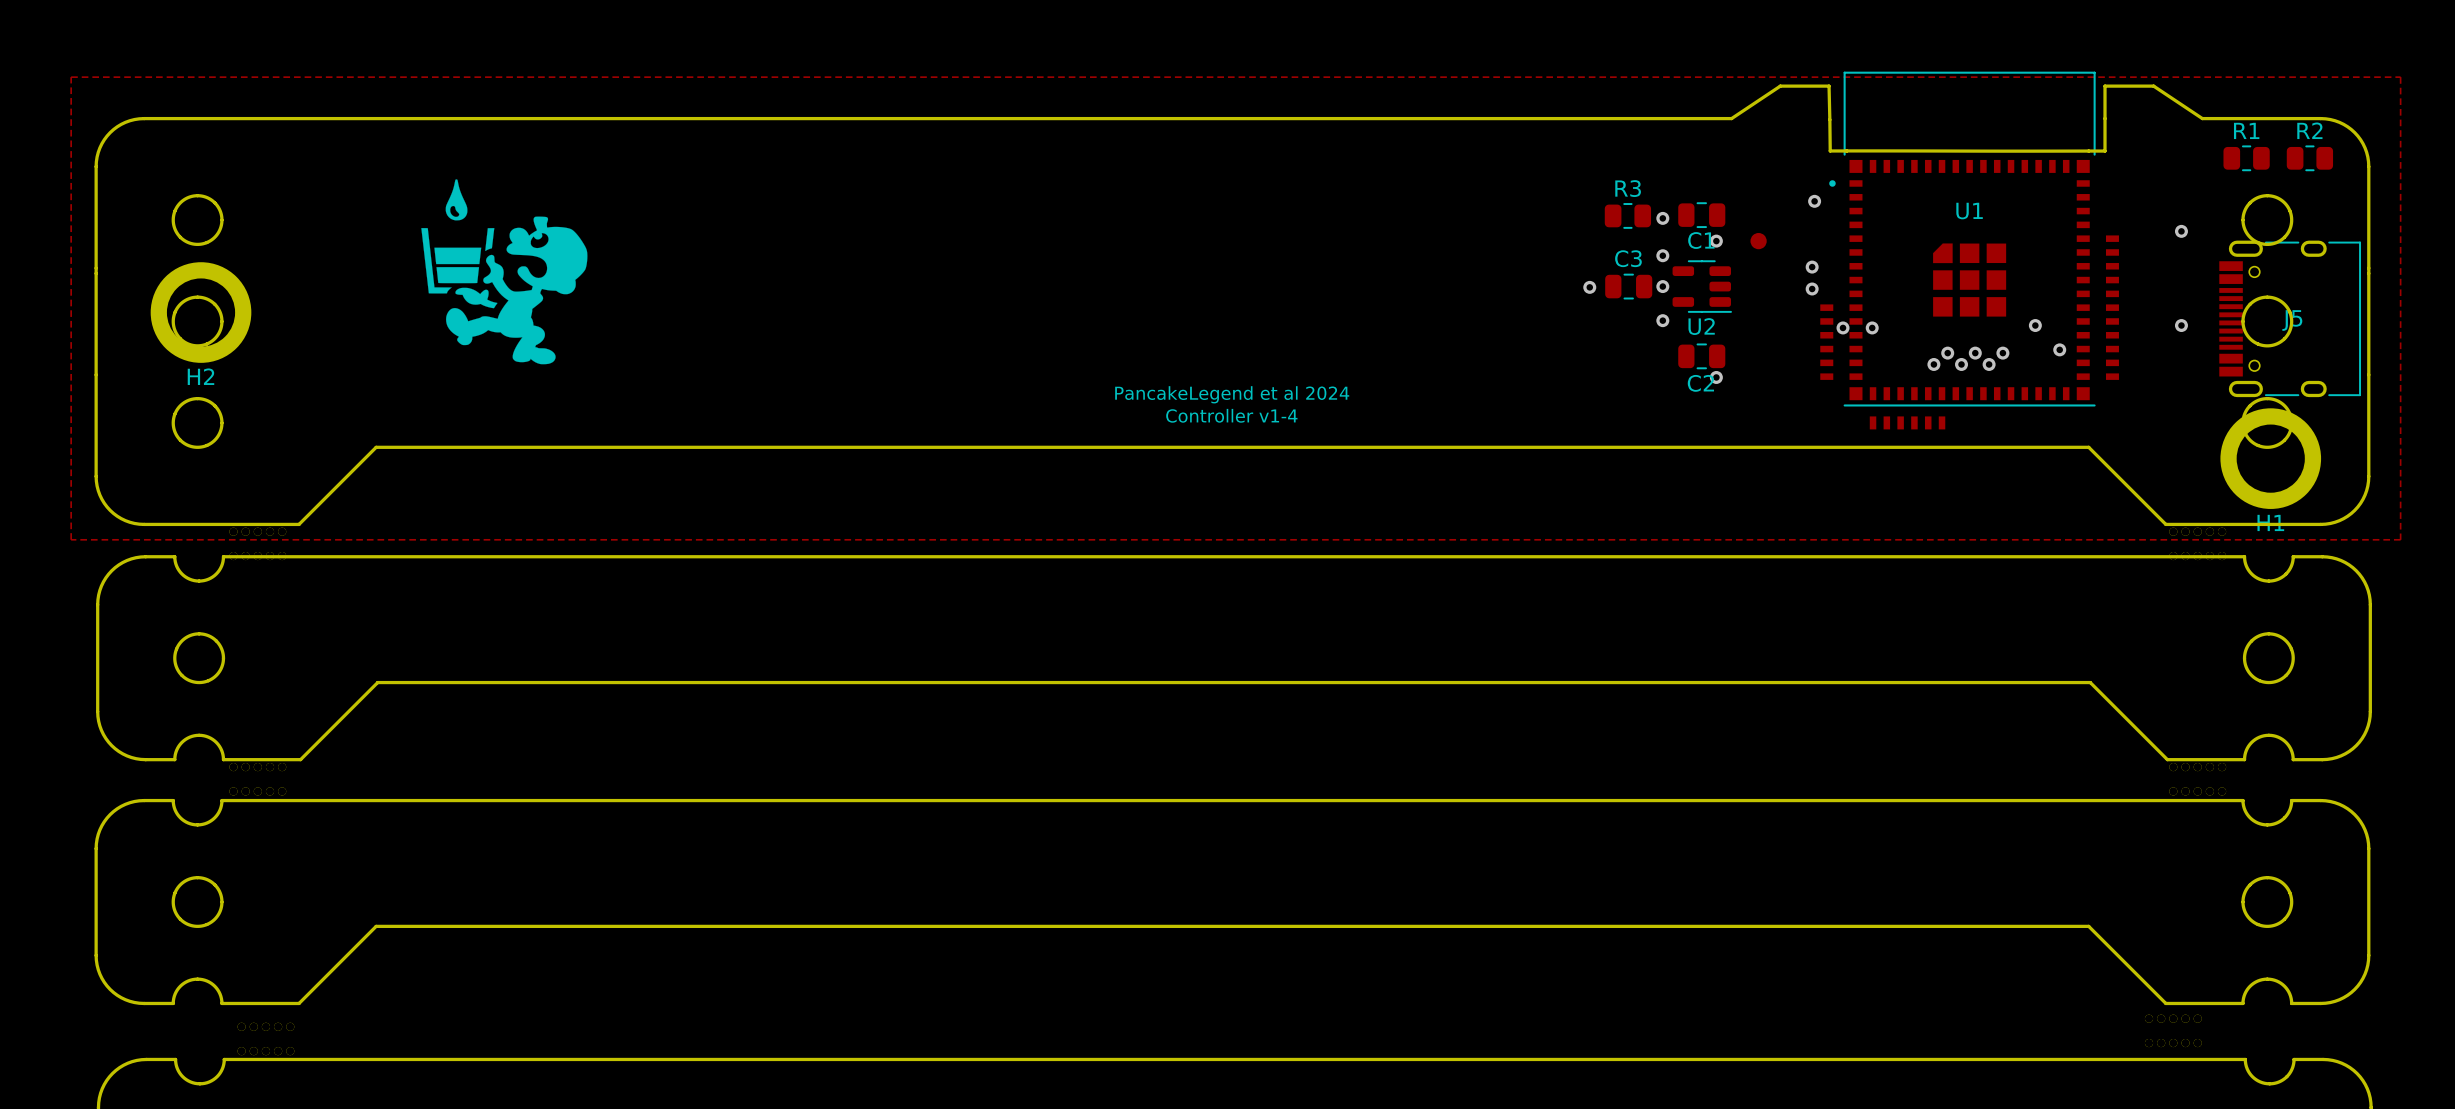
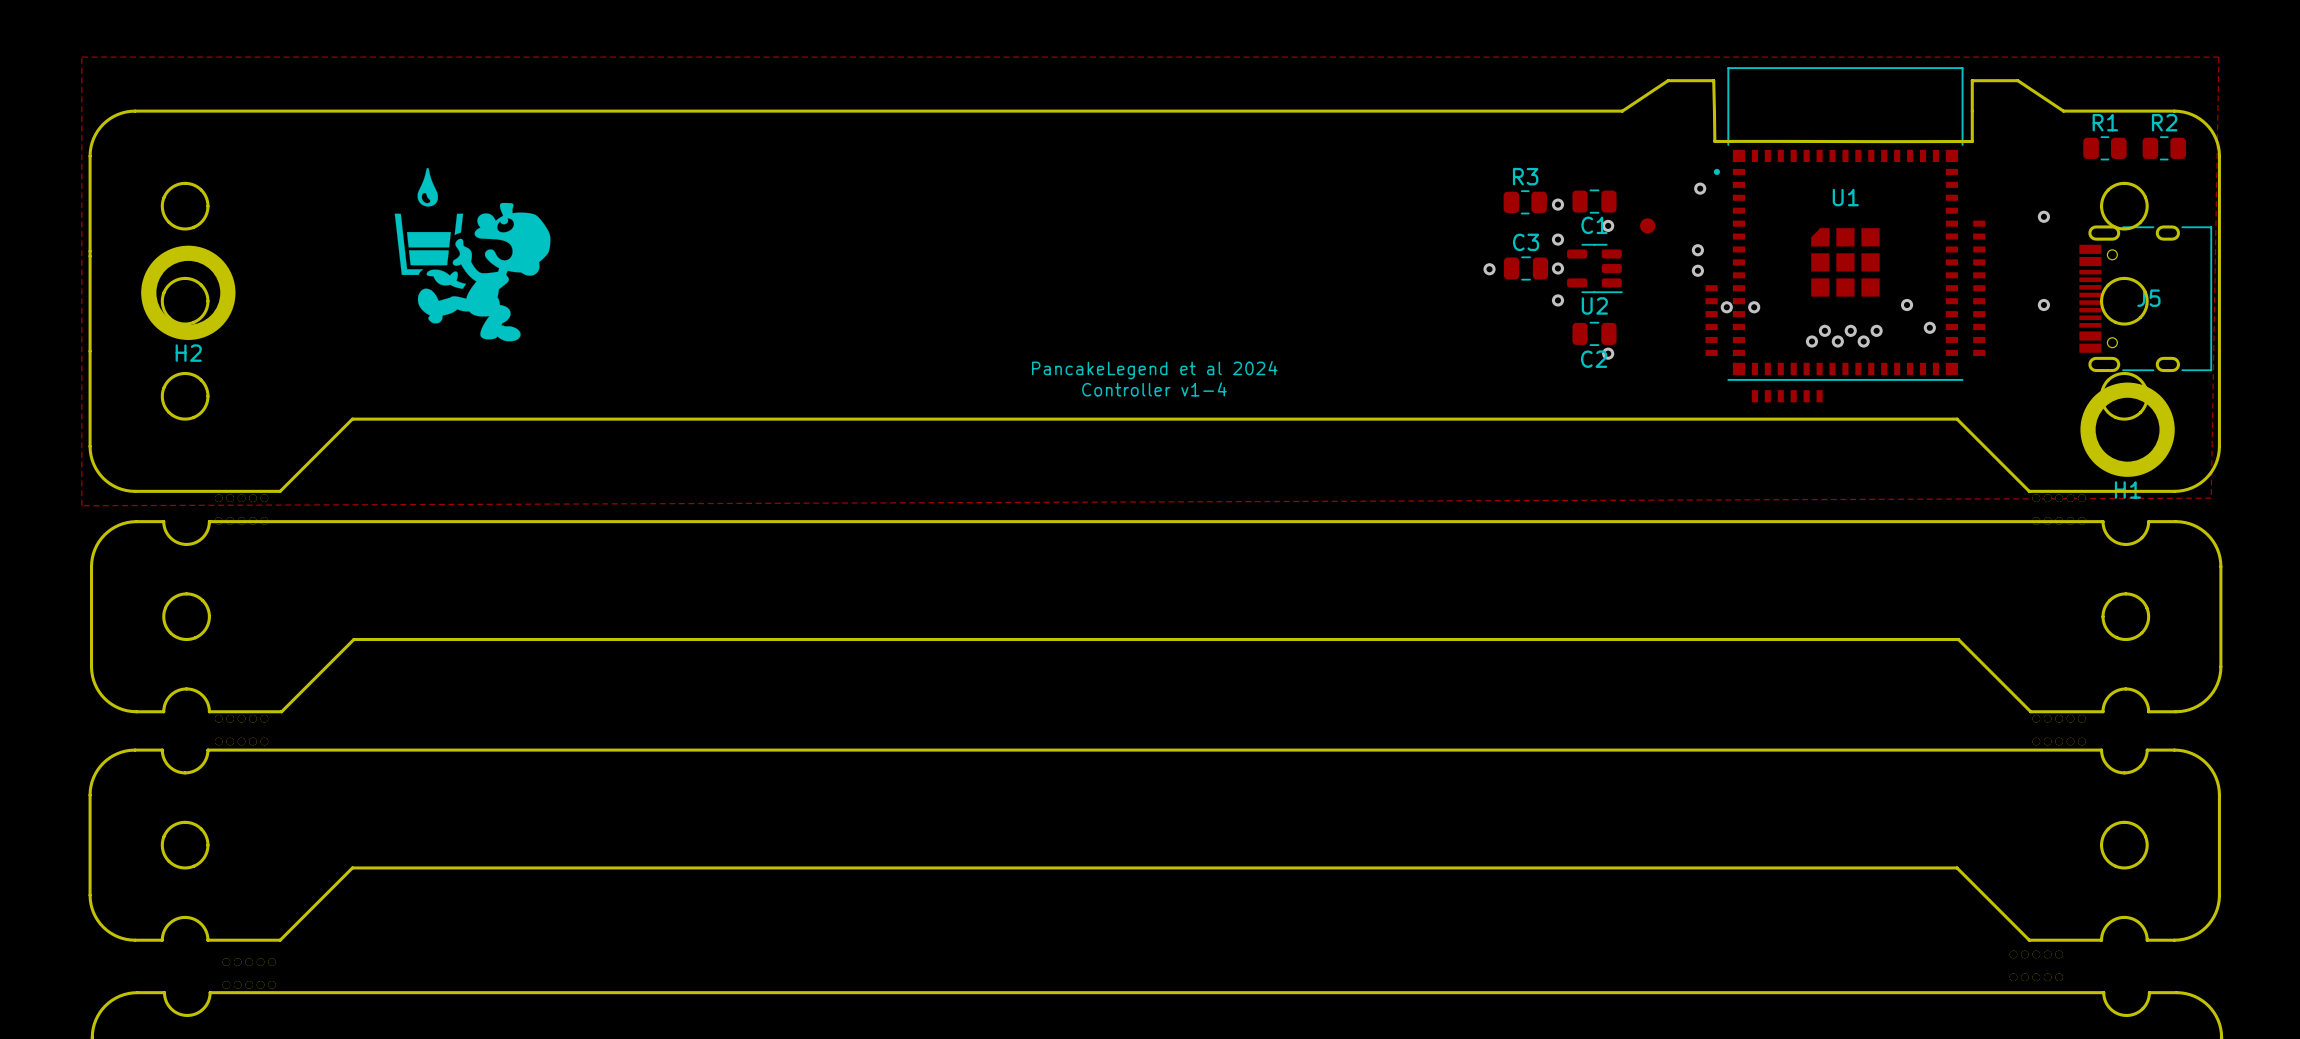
zone outline: (71, 77) (71, 539) (2400, 539) (2400, 77) (71, 77) -> (81, 57) (81, 505) (2211, 498) (2218, 57) (81, 57)

